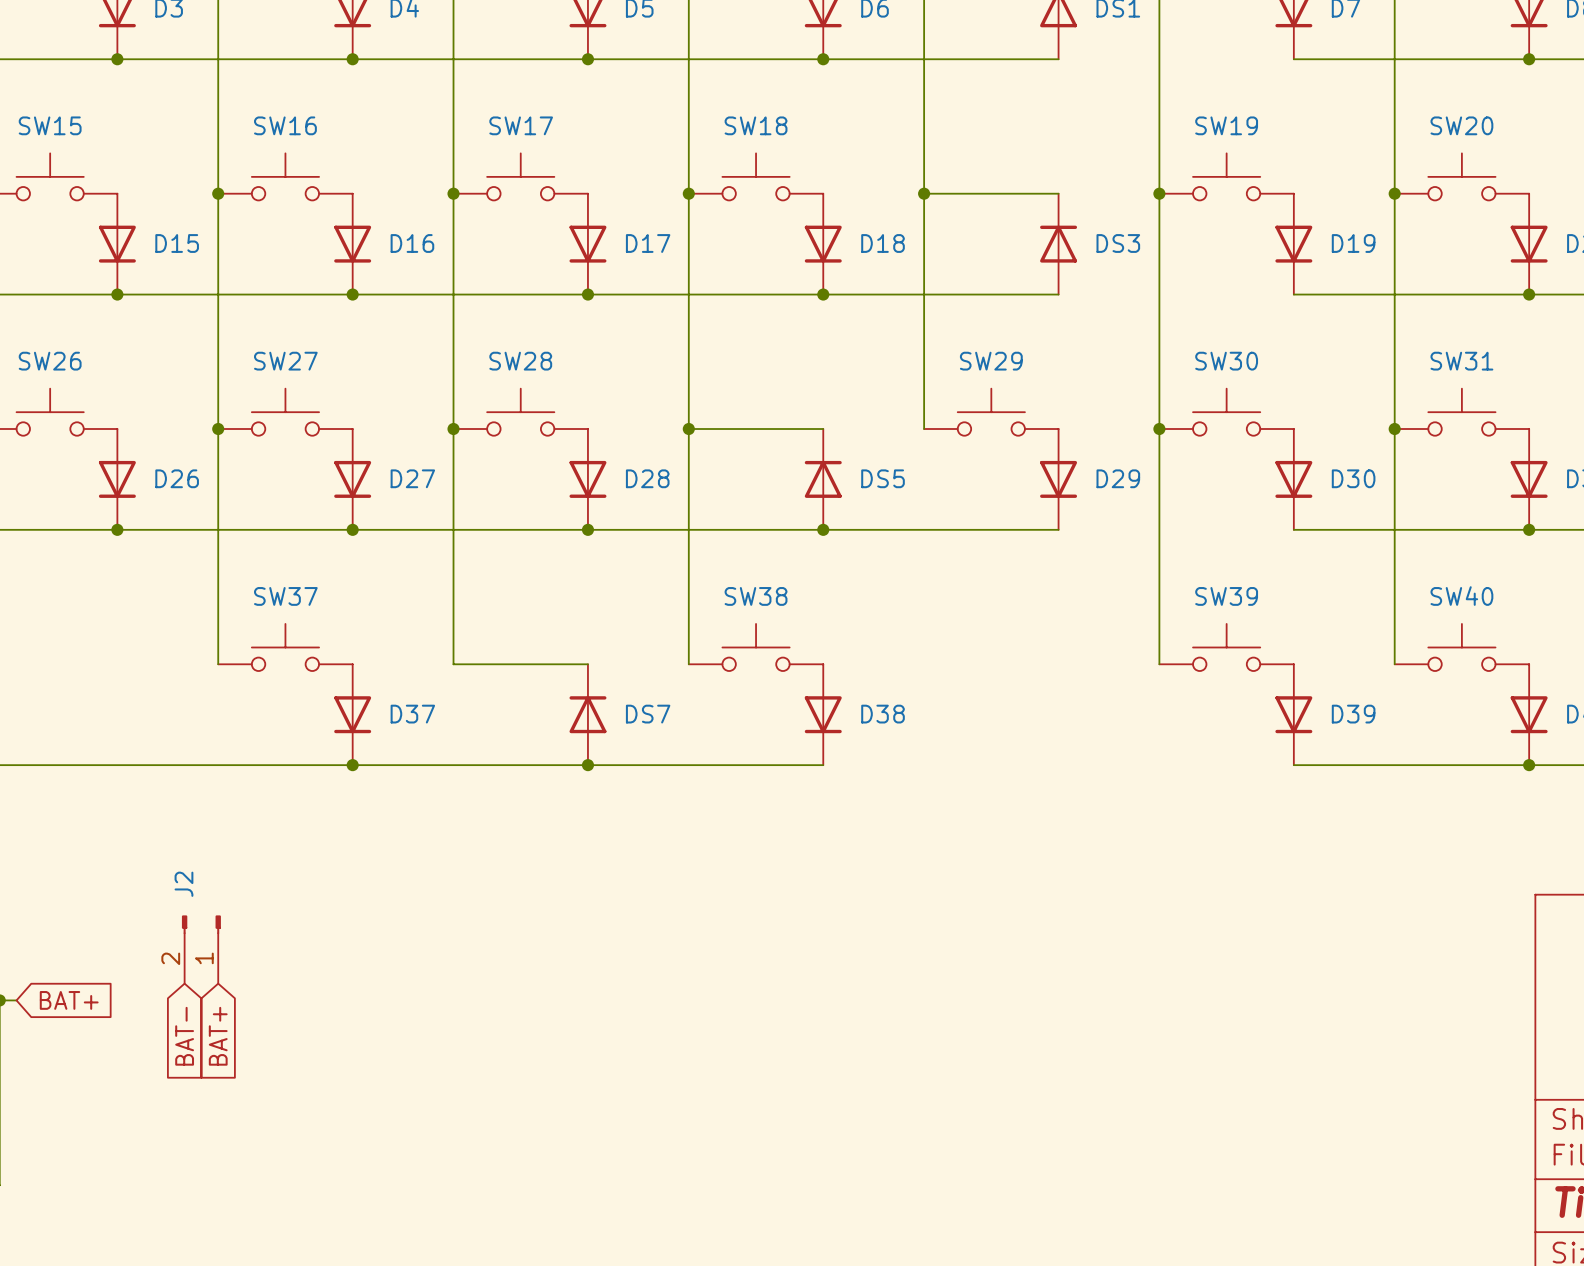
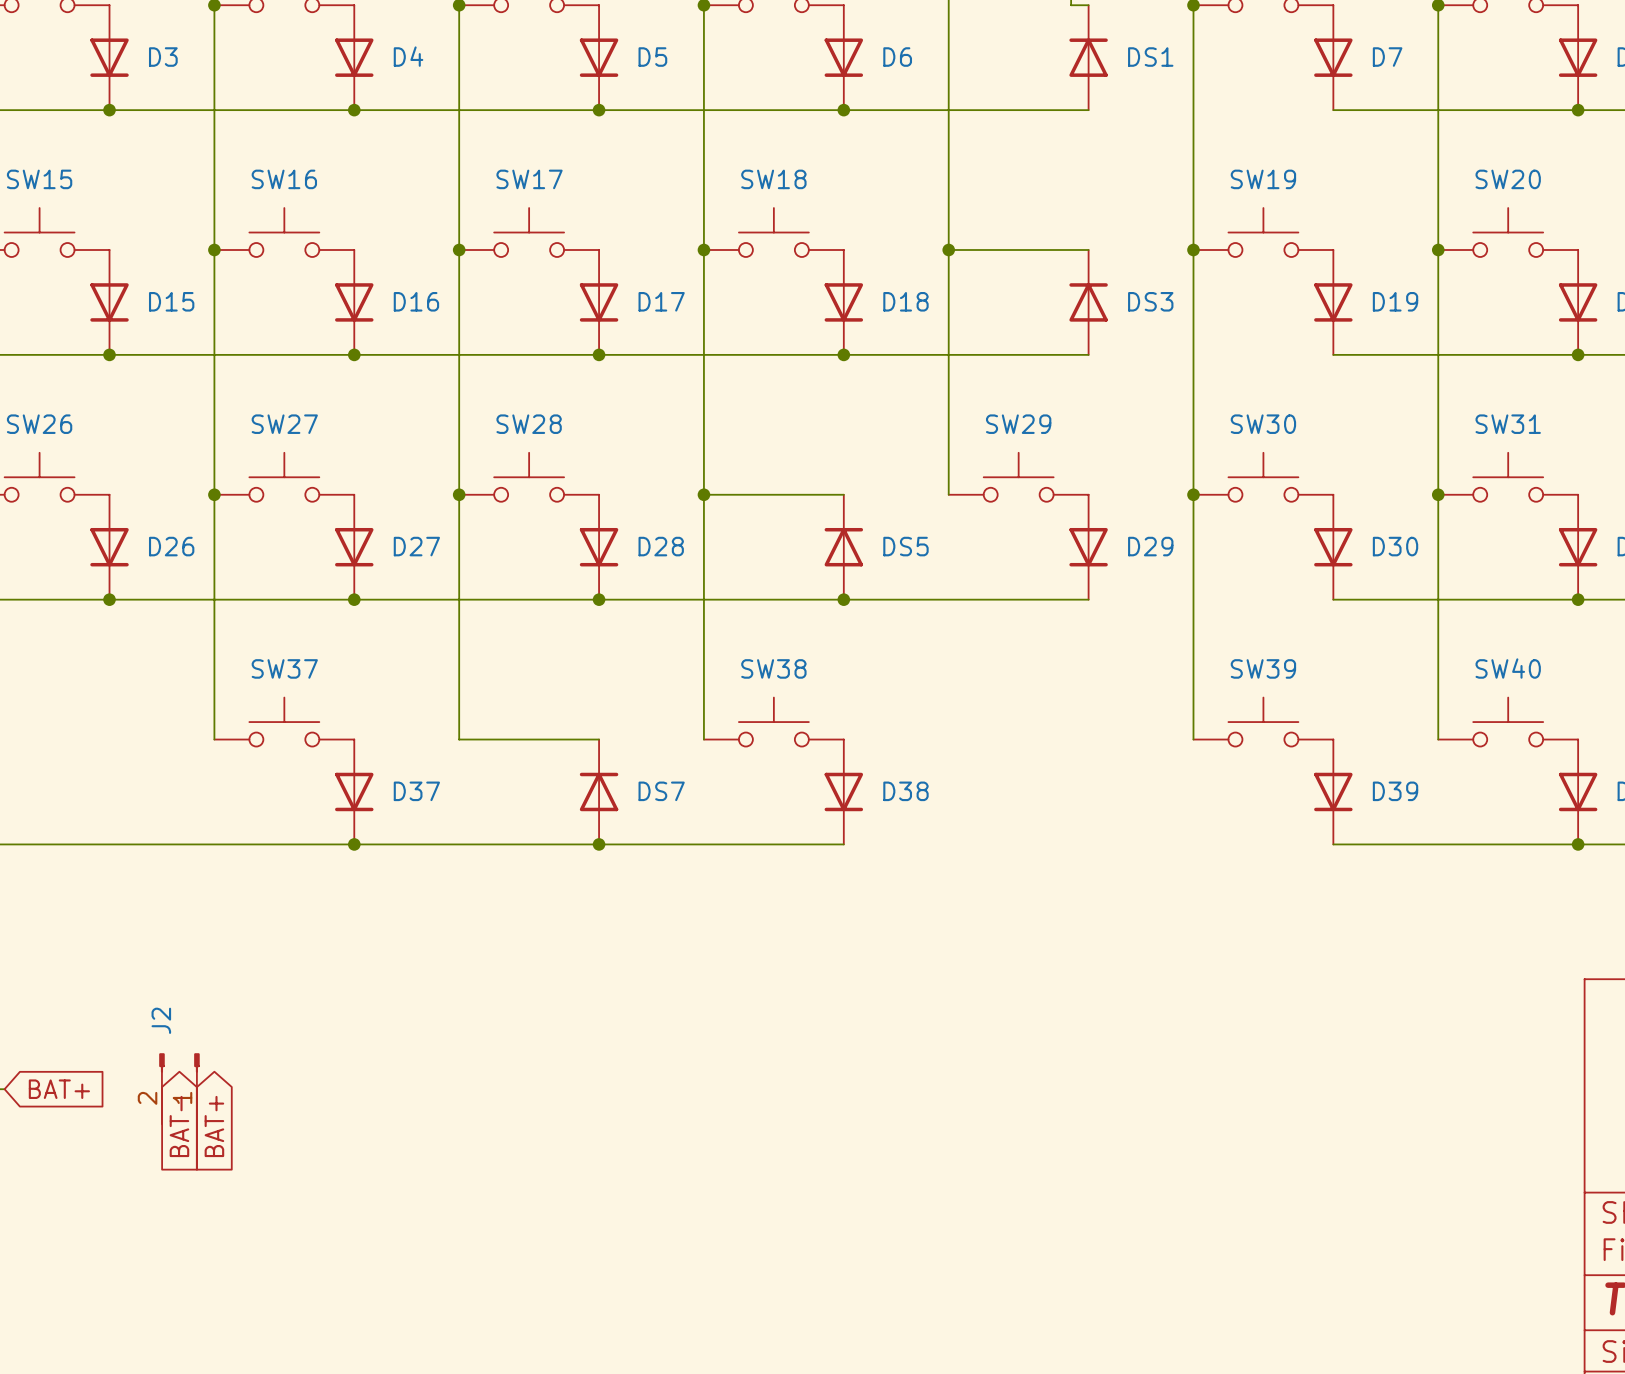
J2 position: (201, 949) -> (179, 1088)

